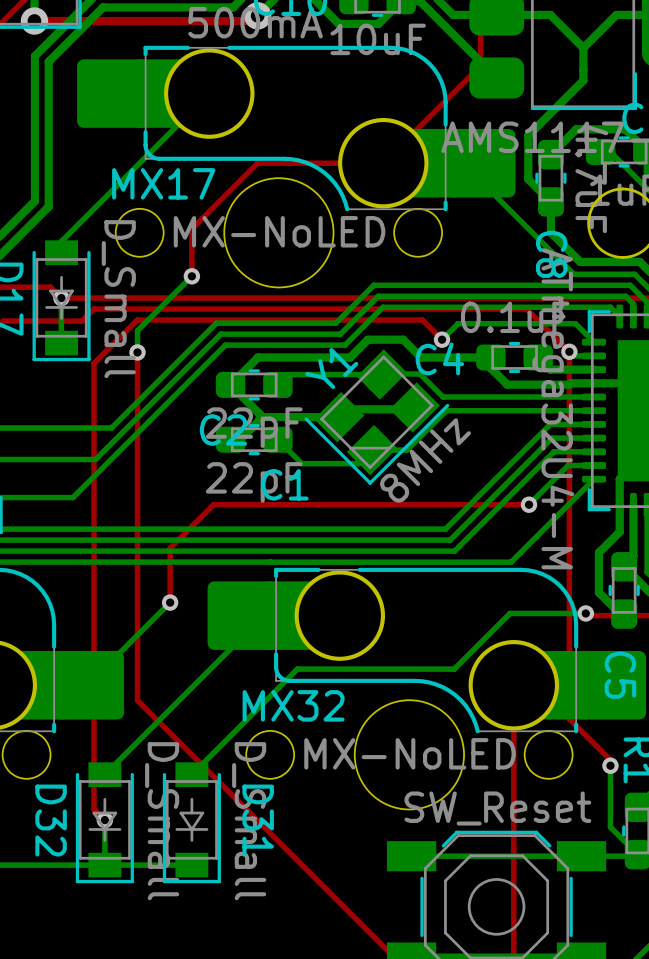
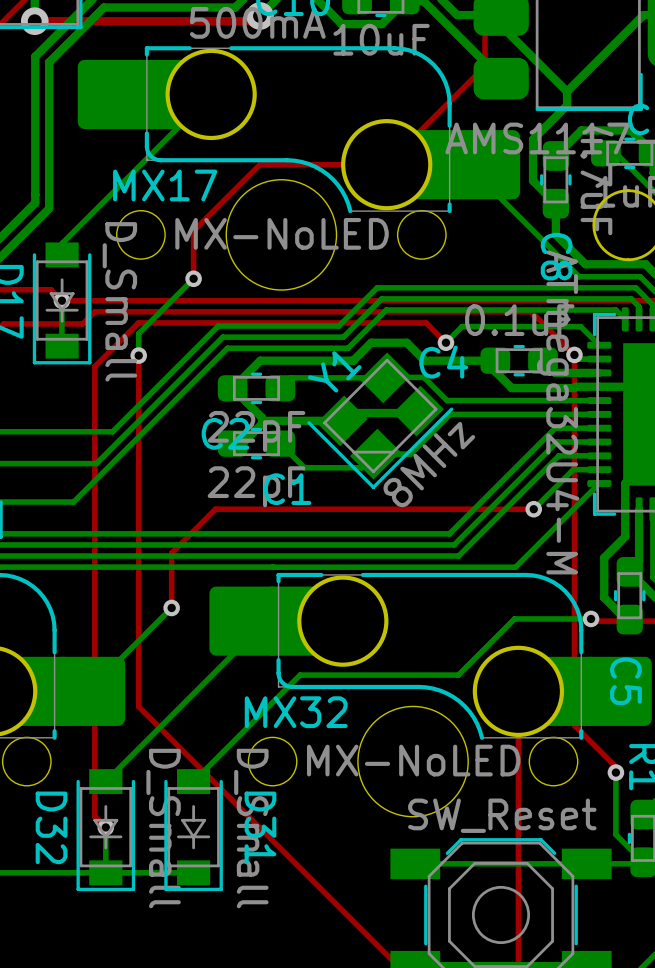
bottom track: (496, 14) (550, 14) (583, 47) -> none
bottom track: (637, 14) (616, 14) (583, 47) -> (643, 15) (567, 91)
bottom track: none -> (490, 15) (567, 91)
bottom track: (583, 47) (583, 80) (528, 135) (528, 138) -> (567, 91) (567, 105) (533, 139)

